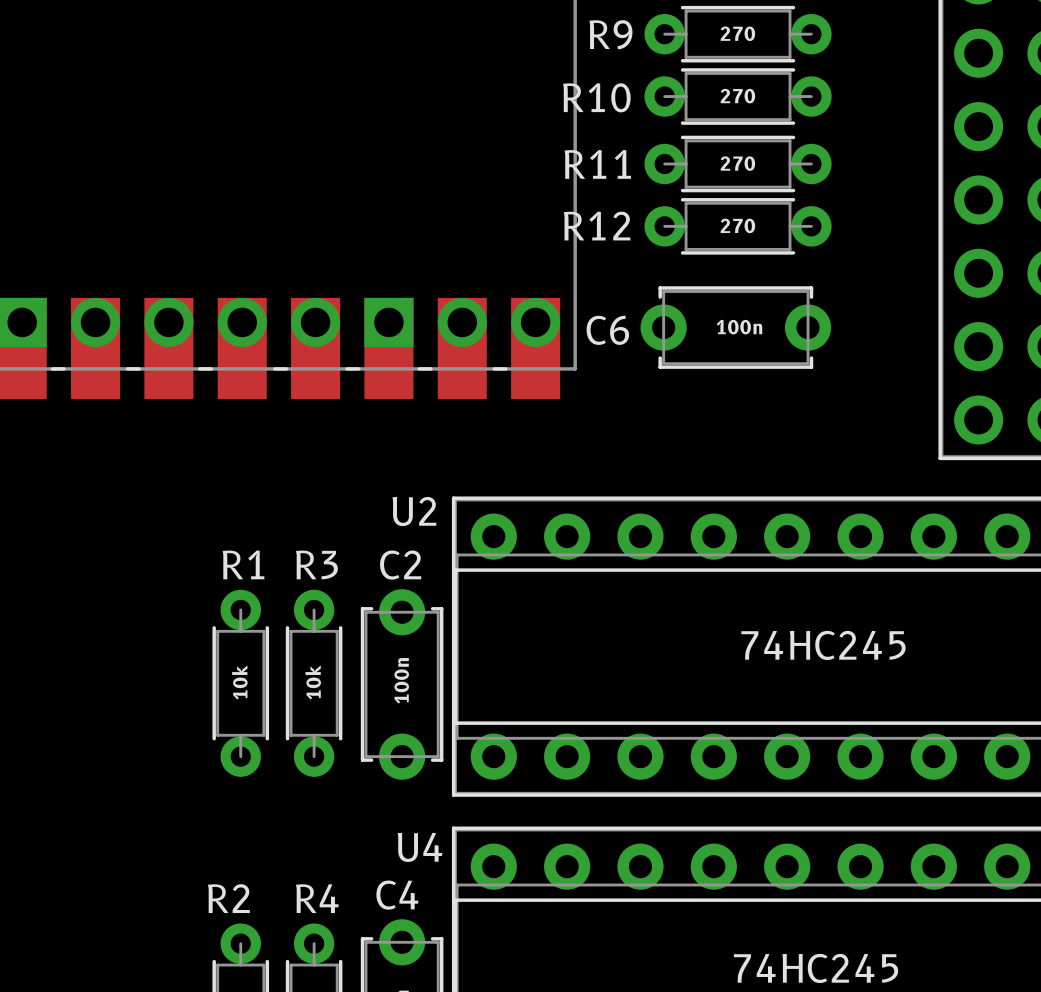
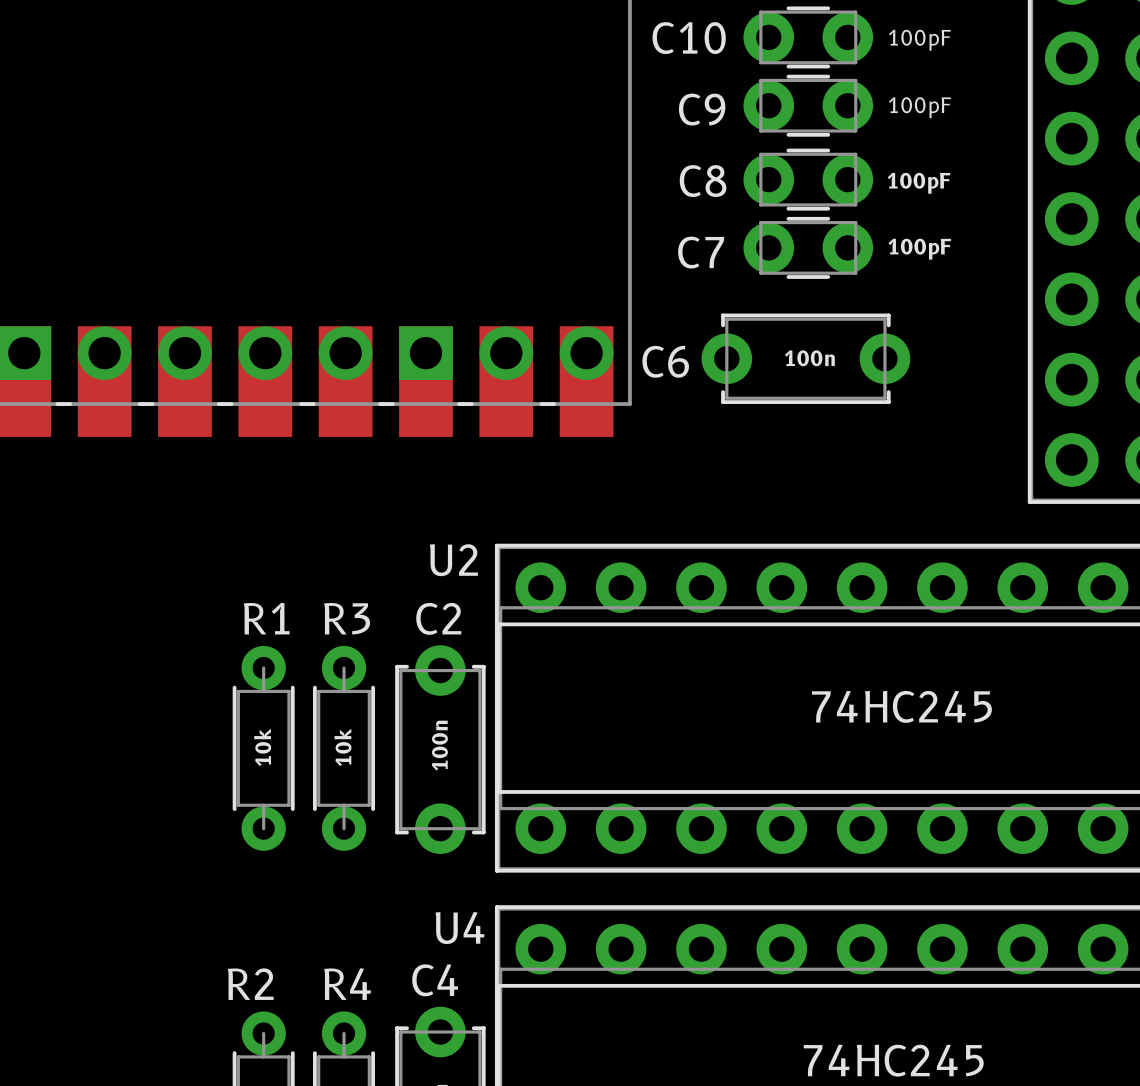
R9: 270 (738, 34) -> none
C10: none -> 100pF (808, 37)
R10: 270 (738, 96) -> none
C9: none -> 100pF (808, 105)
R11: 270 (738, 164) -> none
C8: none -> 100pF (808, 179)
R12: 270 (738, 226) -> none
C7: none -> 100pF (808, 247)

